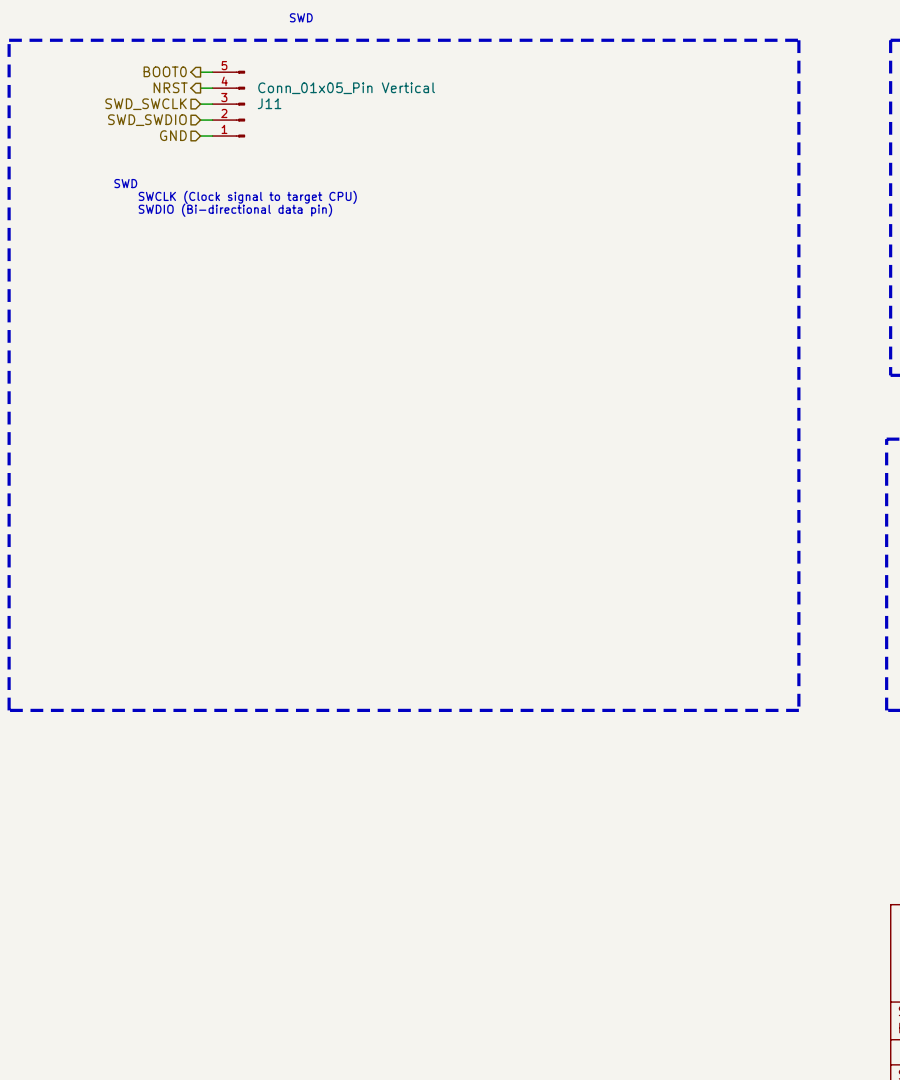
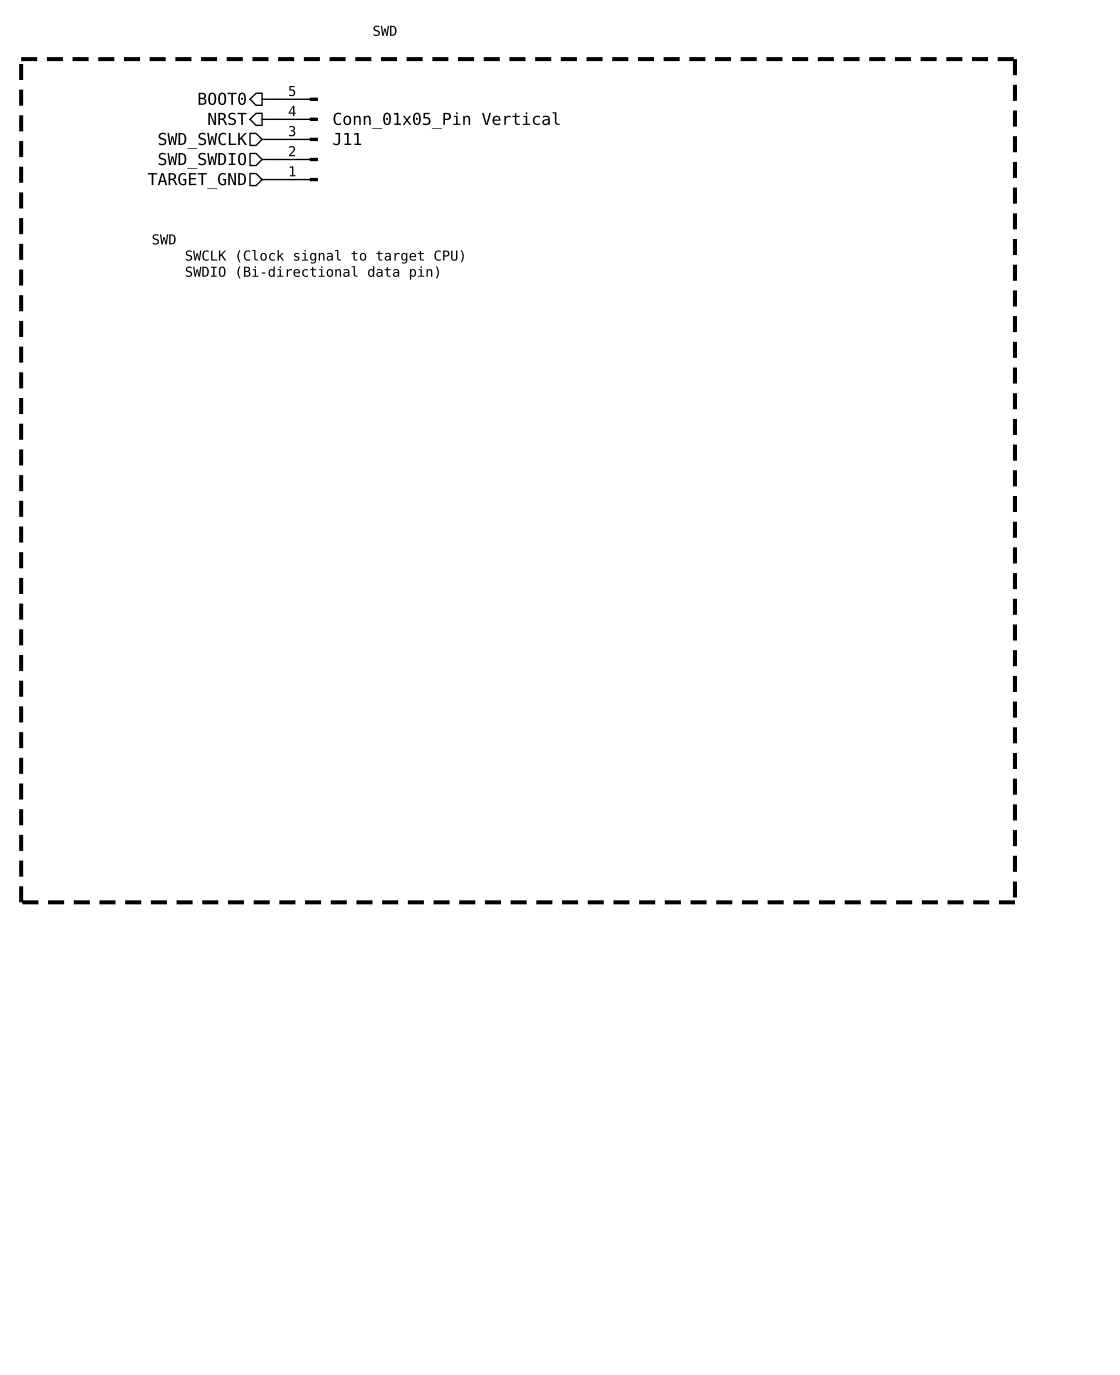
hierarchical label: GND (173, 135) -> TARGET_GND (196, 180)

